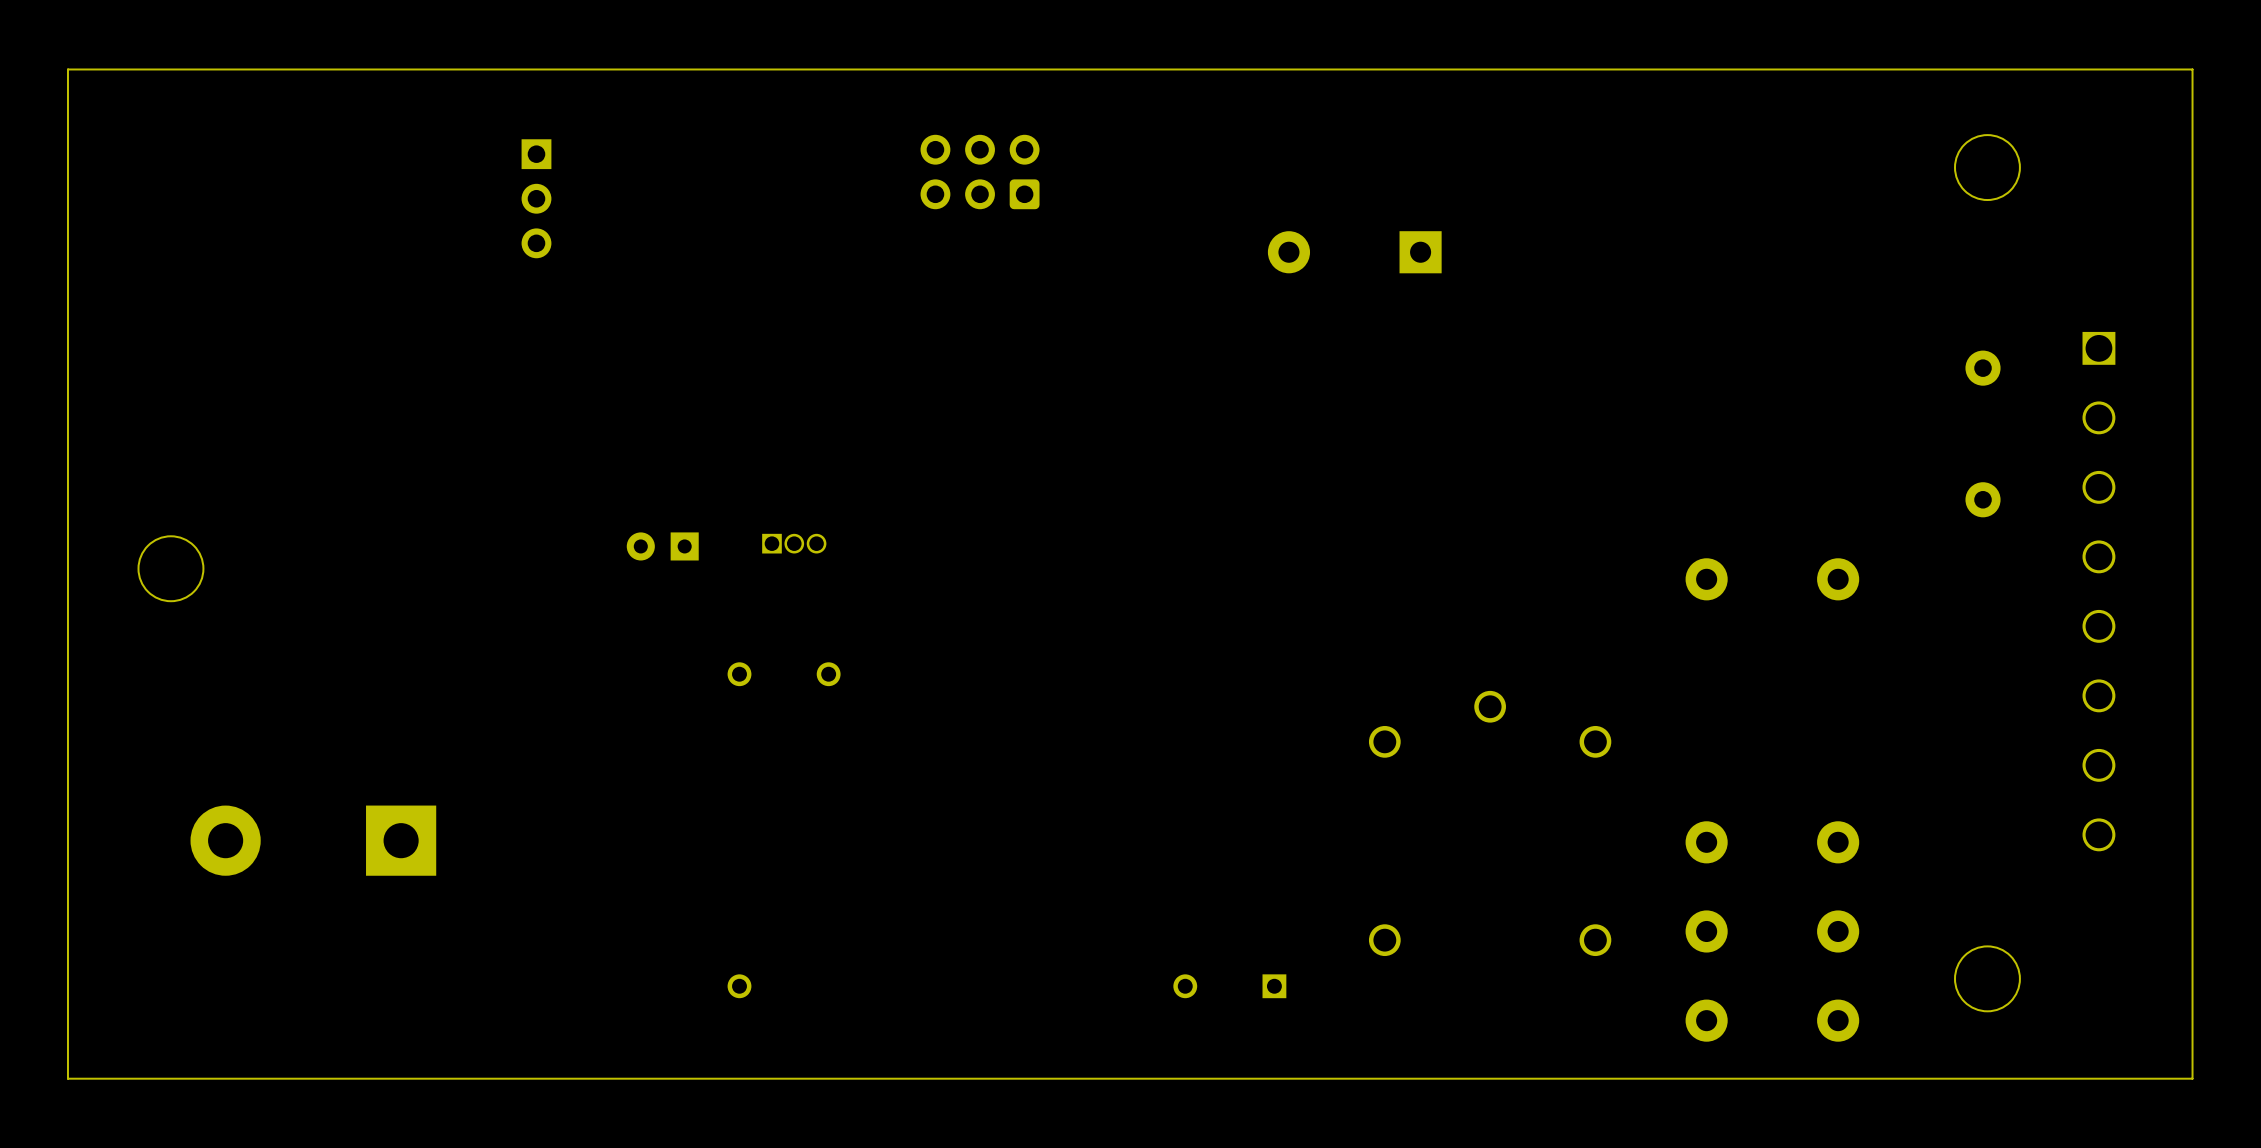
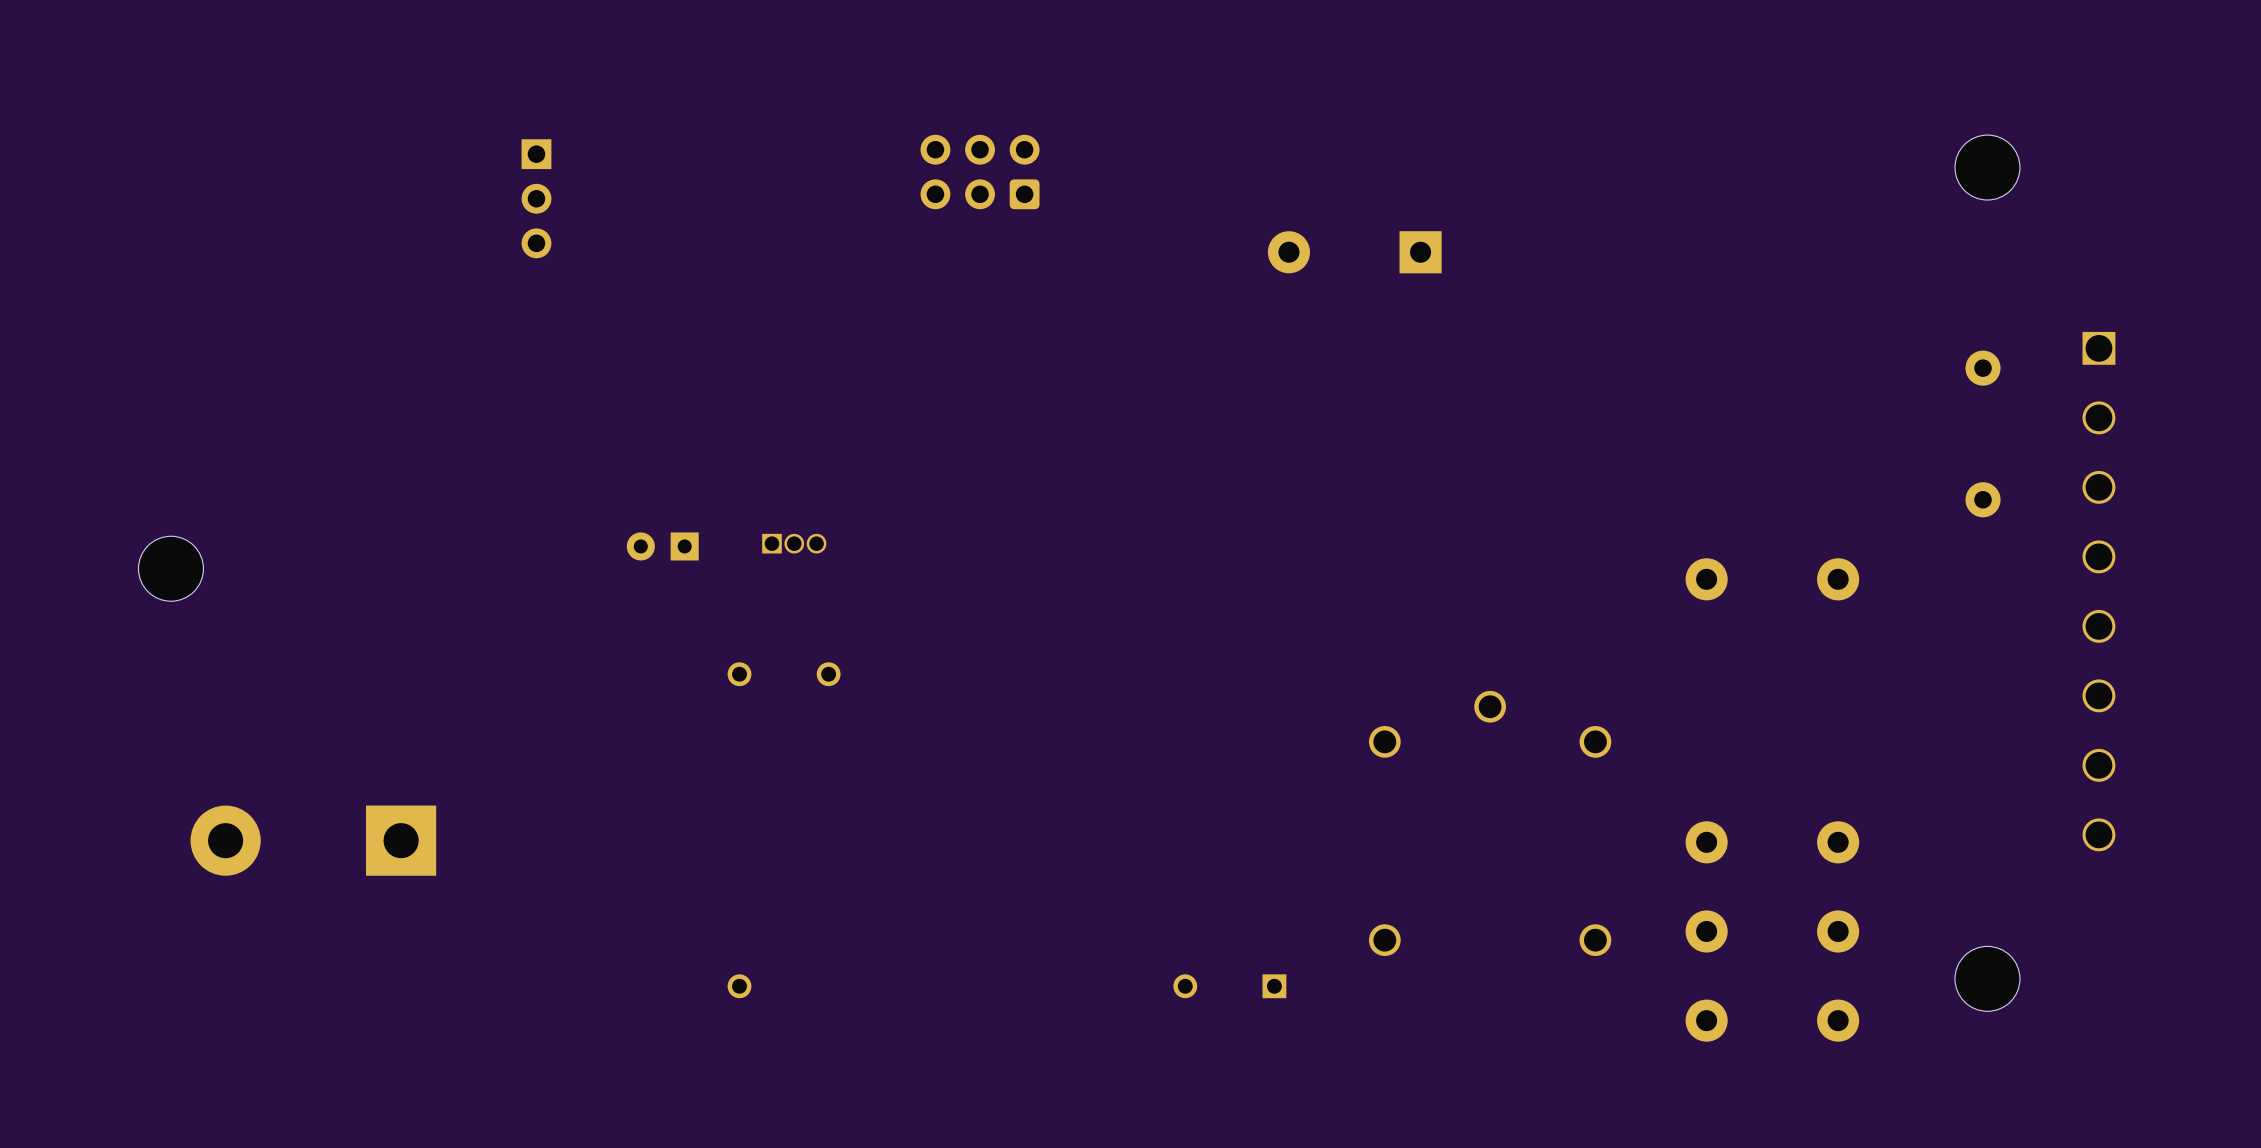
board edge: (2192, 69) (67, 69) (67, 1078) (2192, 1078) (2192, 69) -> none

